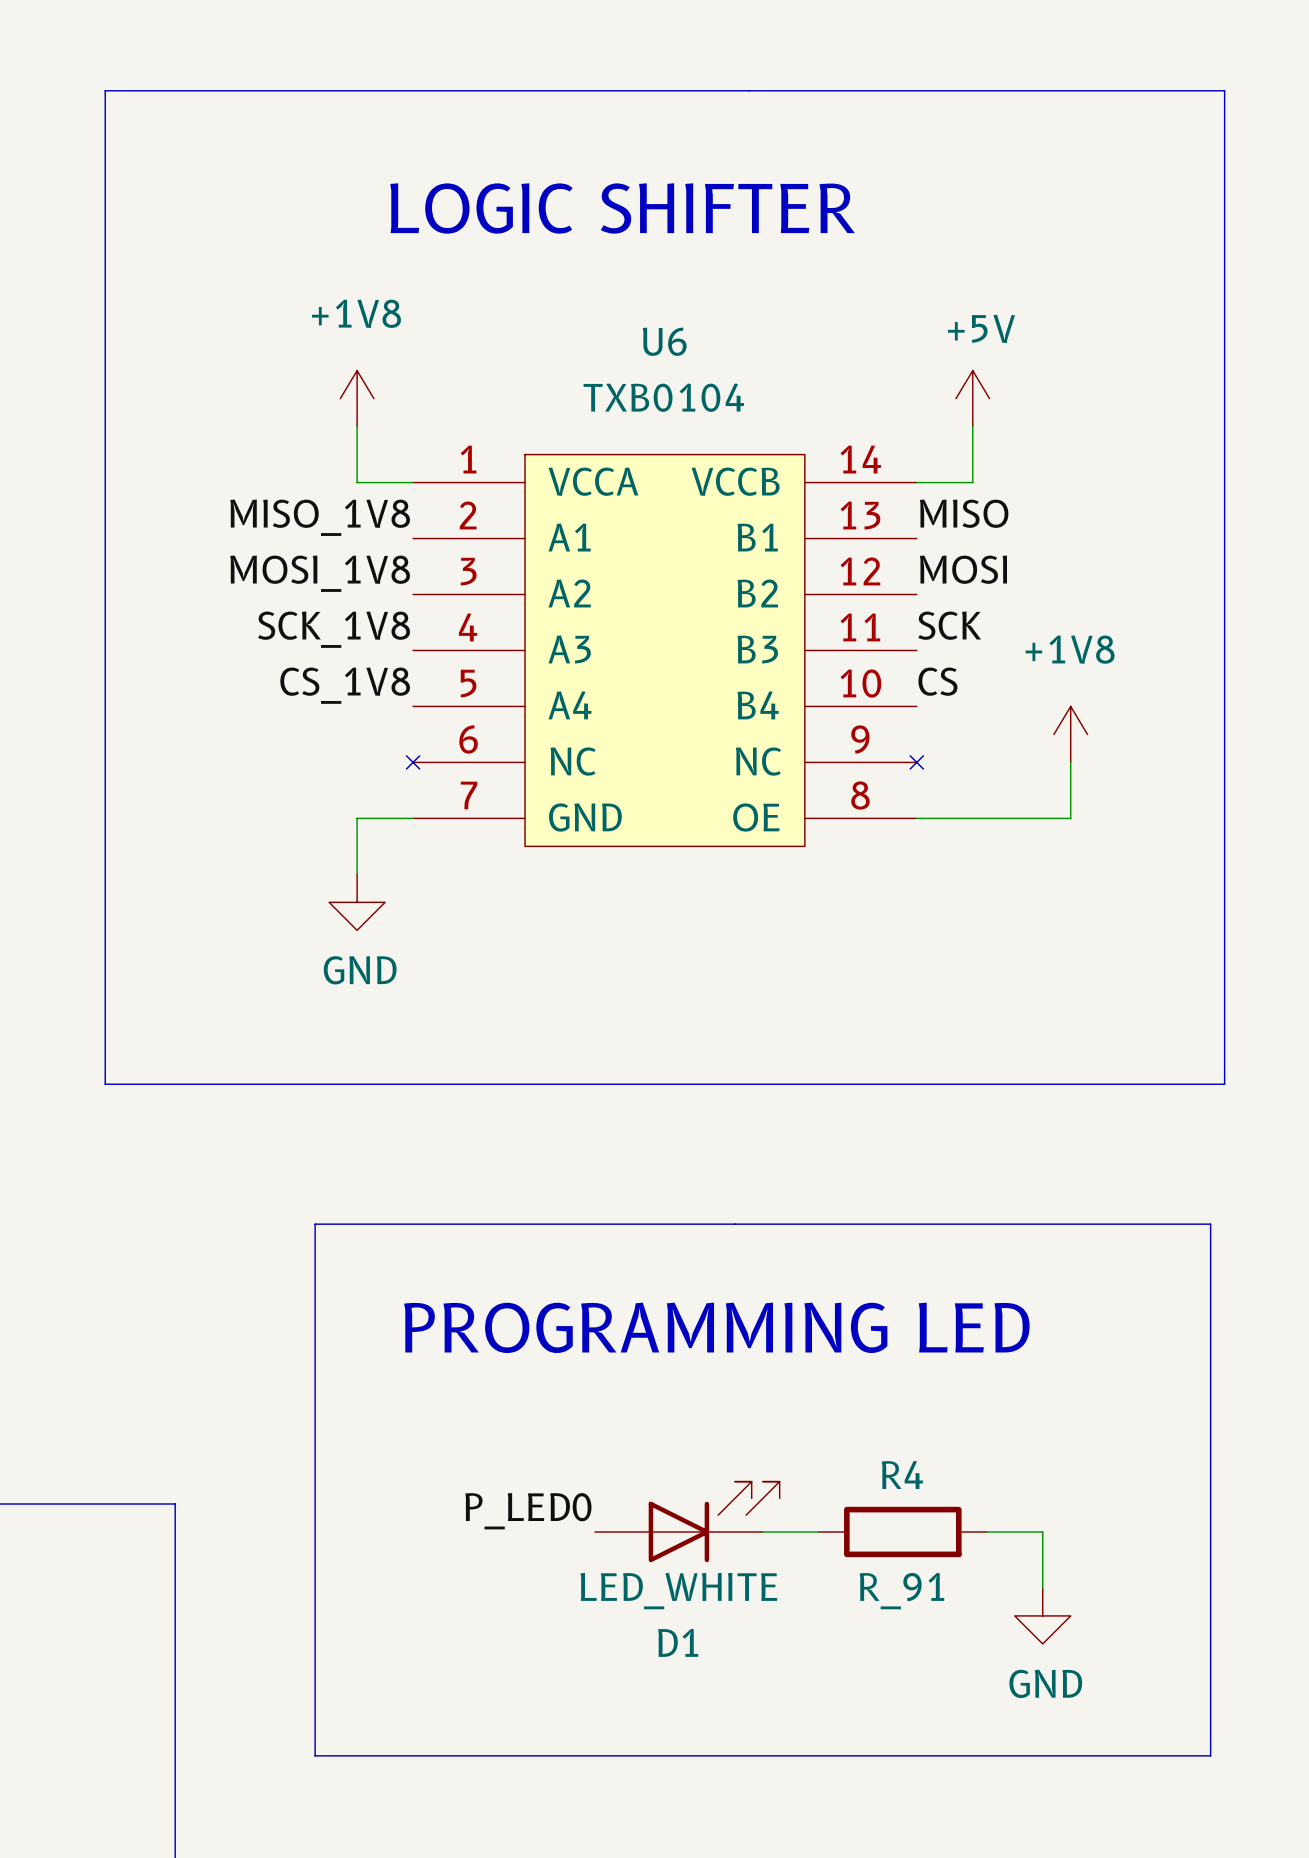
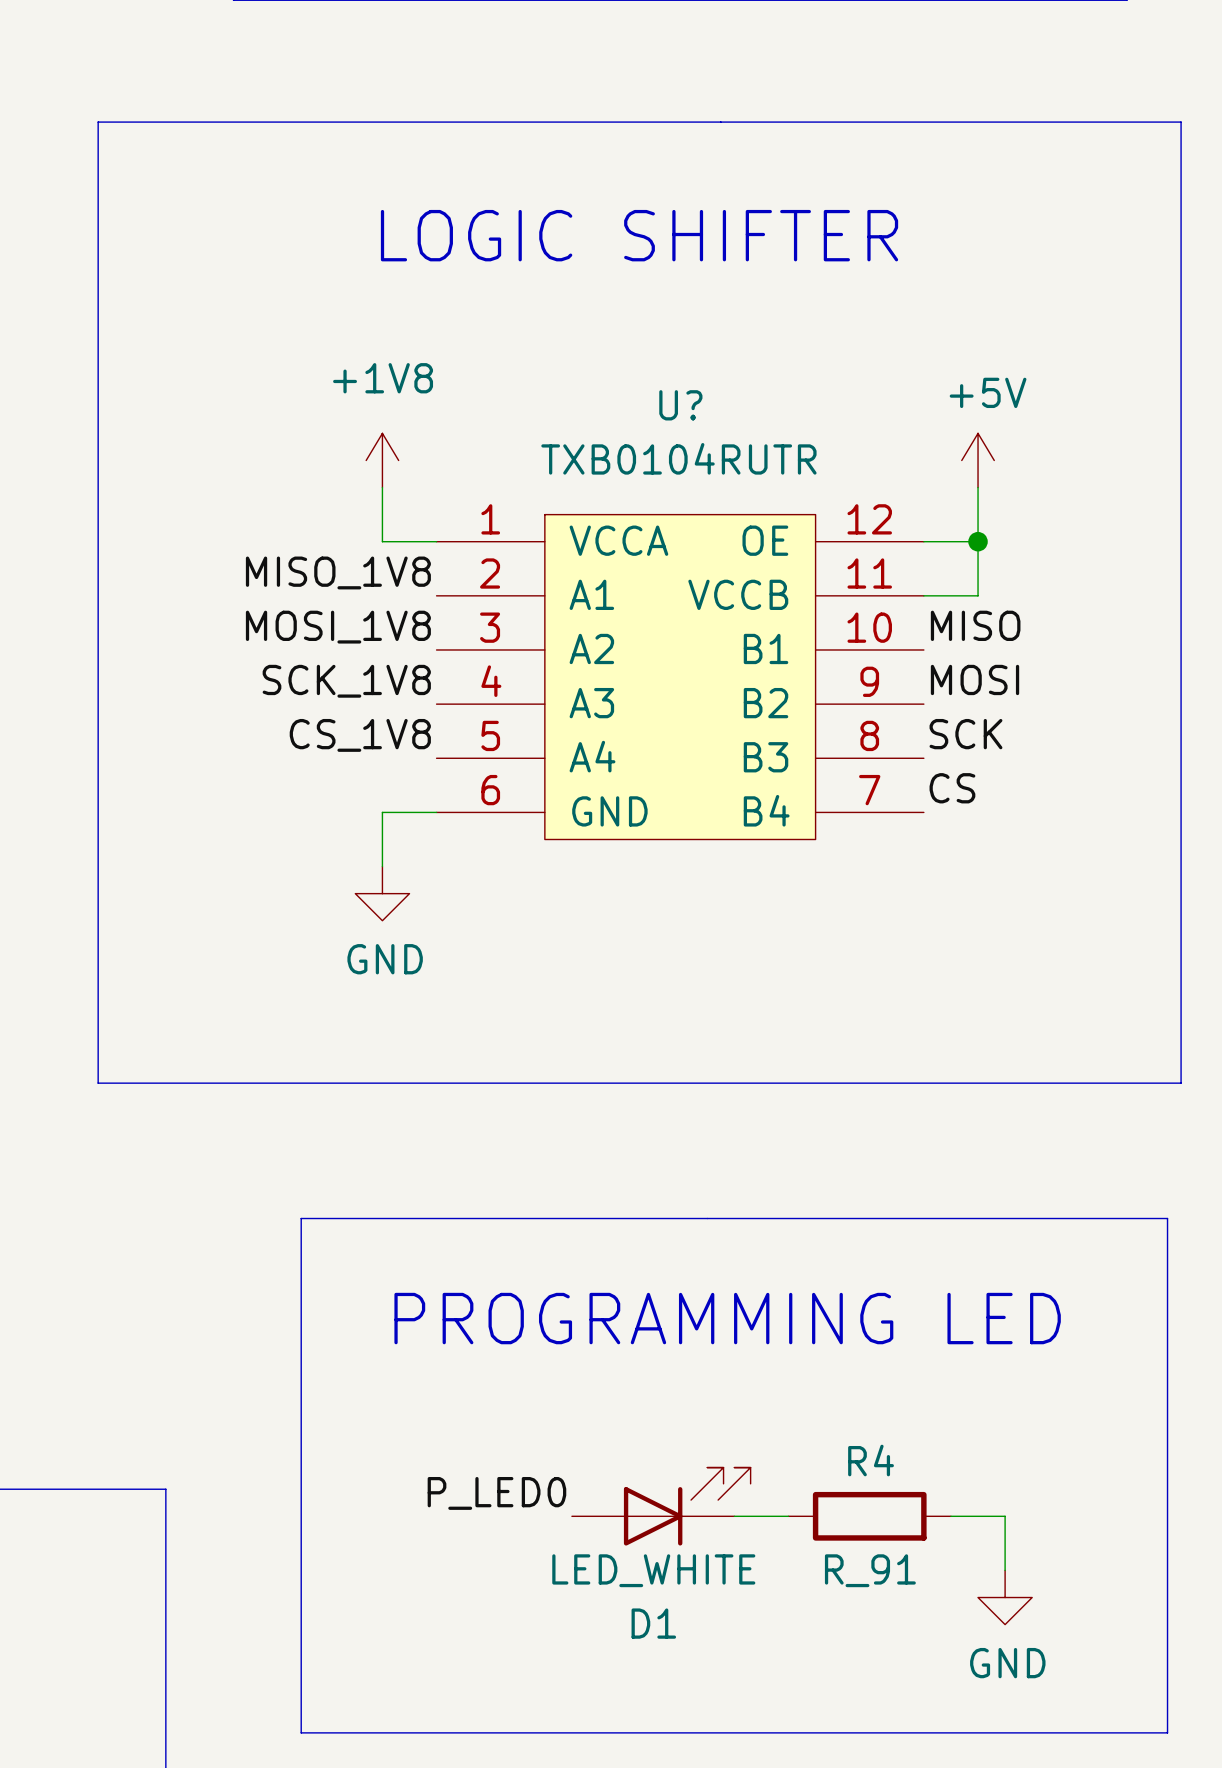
power symbol position: +1V8 (357, 398) -> +1V8 (382, 460)
power symbol position: +5V (972, 398) -> +5V (978, 460)
wire: (357, 426) (357, 482) (413, 482) -> (382, 487) (382, 541) (436, 541)
wire: (972, 426) (972, 482) (916, 482) -> none
wire: none -> (978, 487) (978, 595) (923, 595)
label position: MISO (964, 513) -> MISO (975, 625)
label position: MISO_1V8 (320, 517) -> MISO_1V8 (338, 572)
wire: none -> (923, 541) (978, 541)
junction: none -> (978, 541)
label position: MOSI (963, 569) -> MOSI (975, 679)
label position: MOSI_1V8 (320, 573) -> MOSI_1V8 (338, 627)
label position: SCK (949, 625) -> SCK (965, 734)
label position: SCK_1V8 (334, 629) -> SCK_1V8 (346, 681)
U6: TXB0104 (664, 650) -> none
U?: none -> TXB0104RUTR (680, 677)
label position: CS (937, 681) -> CS (952, 788)
label position: CS_1V8 (345, 685) -> CS_1V8 (360, 735)
power symbol: +1V8 (1070, 734) -> none
wire: (1070, 762) (1070, 818) (916, 818) -> none
wire: (413, 818) (357, 818) (357, 874) -> (436, 812) (382, 812) (382, 866)
power symbol position: GND (357, 902) -> GND (382, 893)

